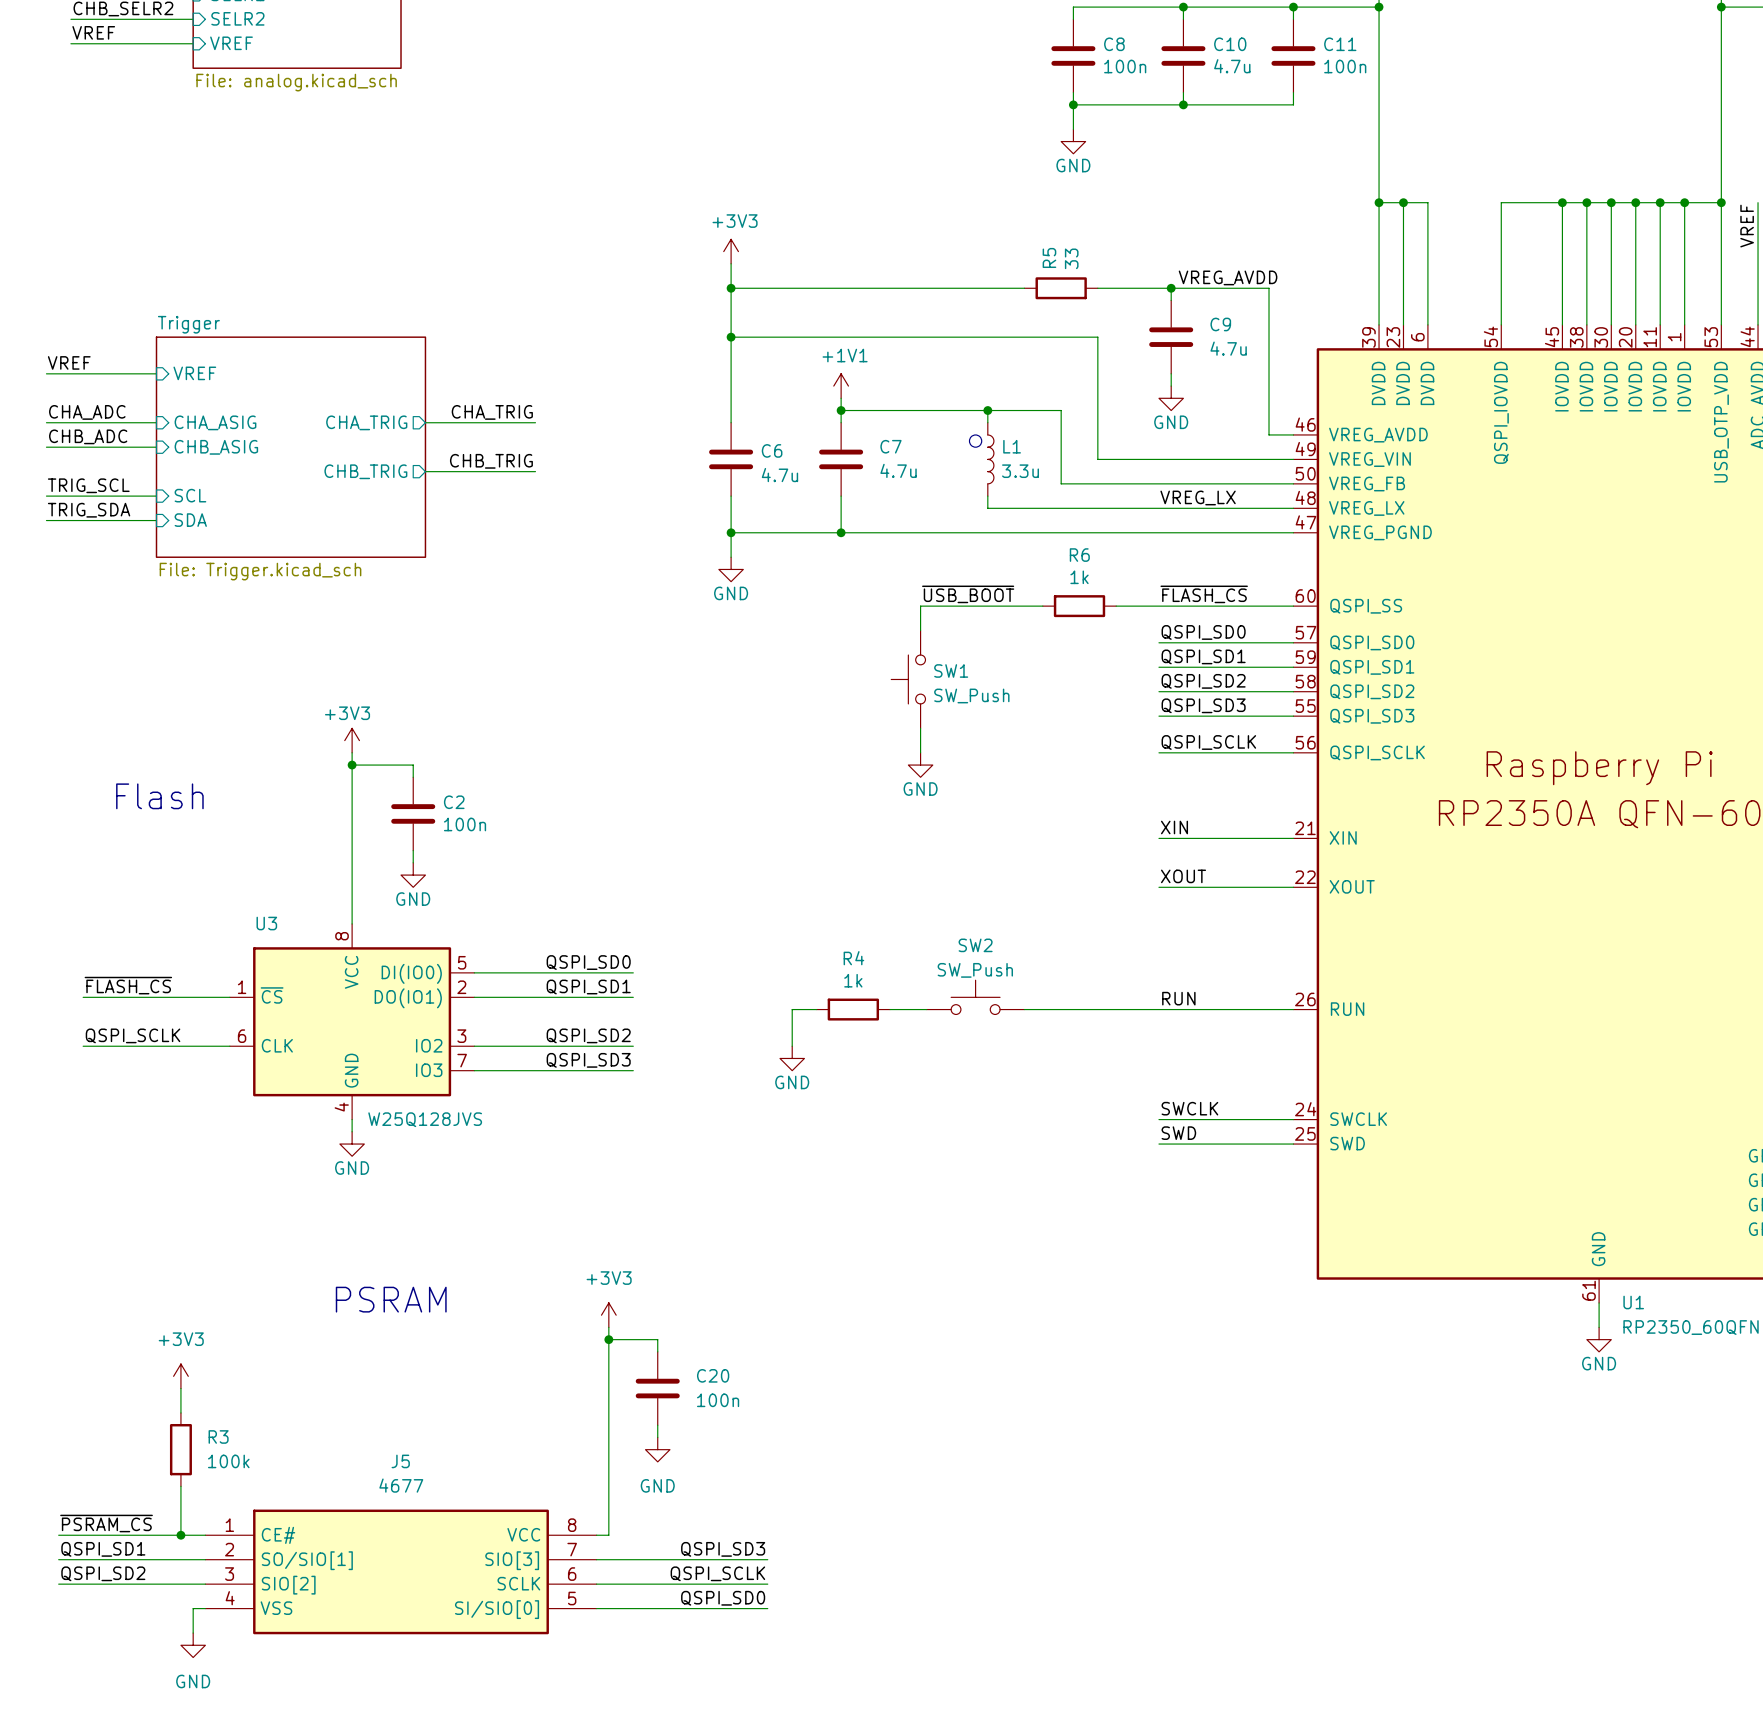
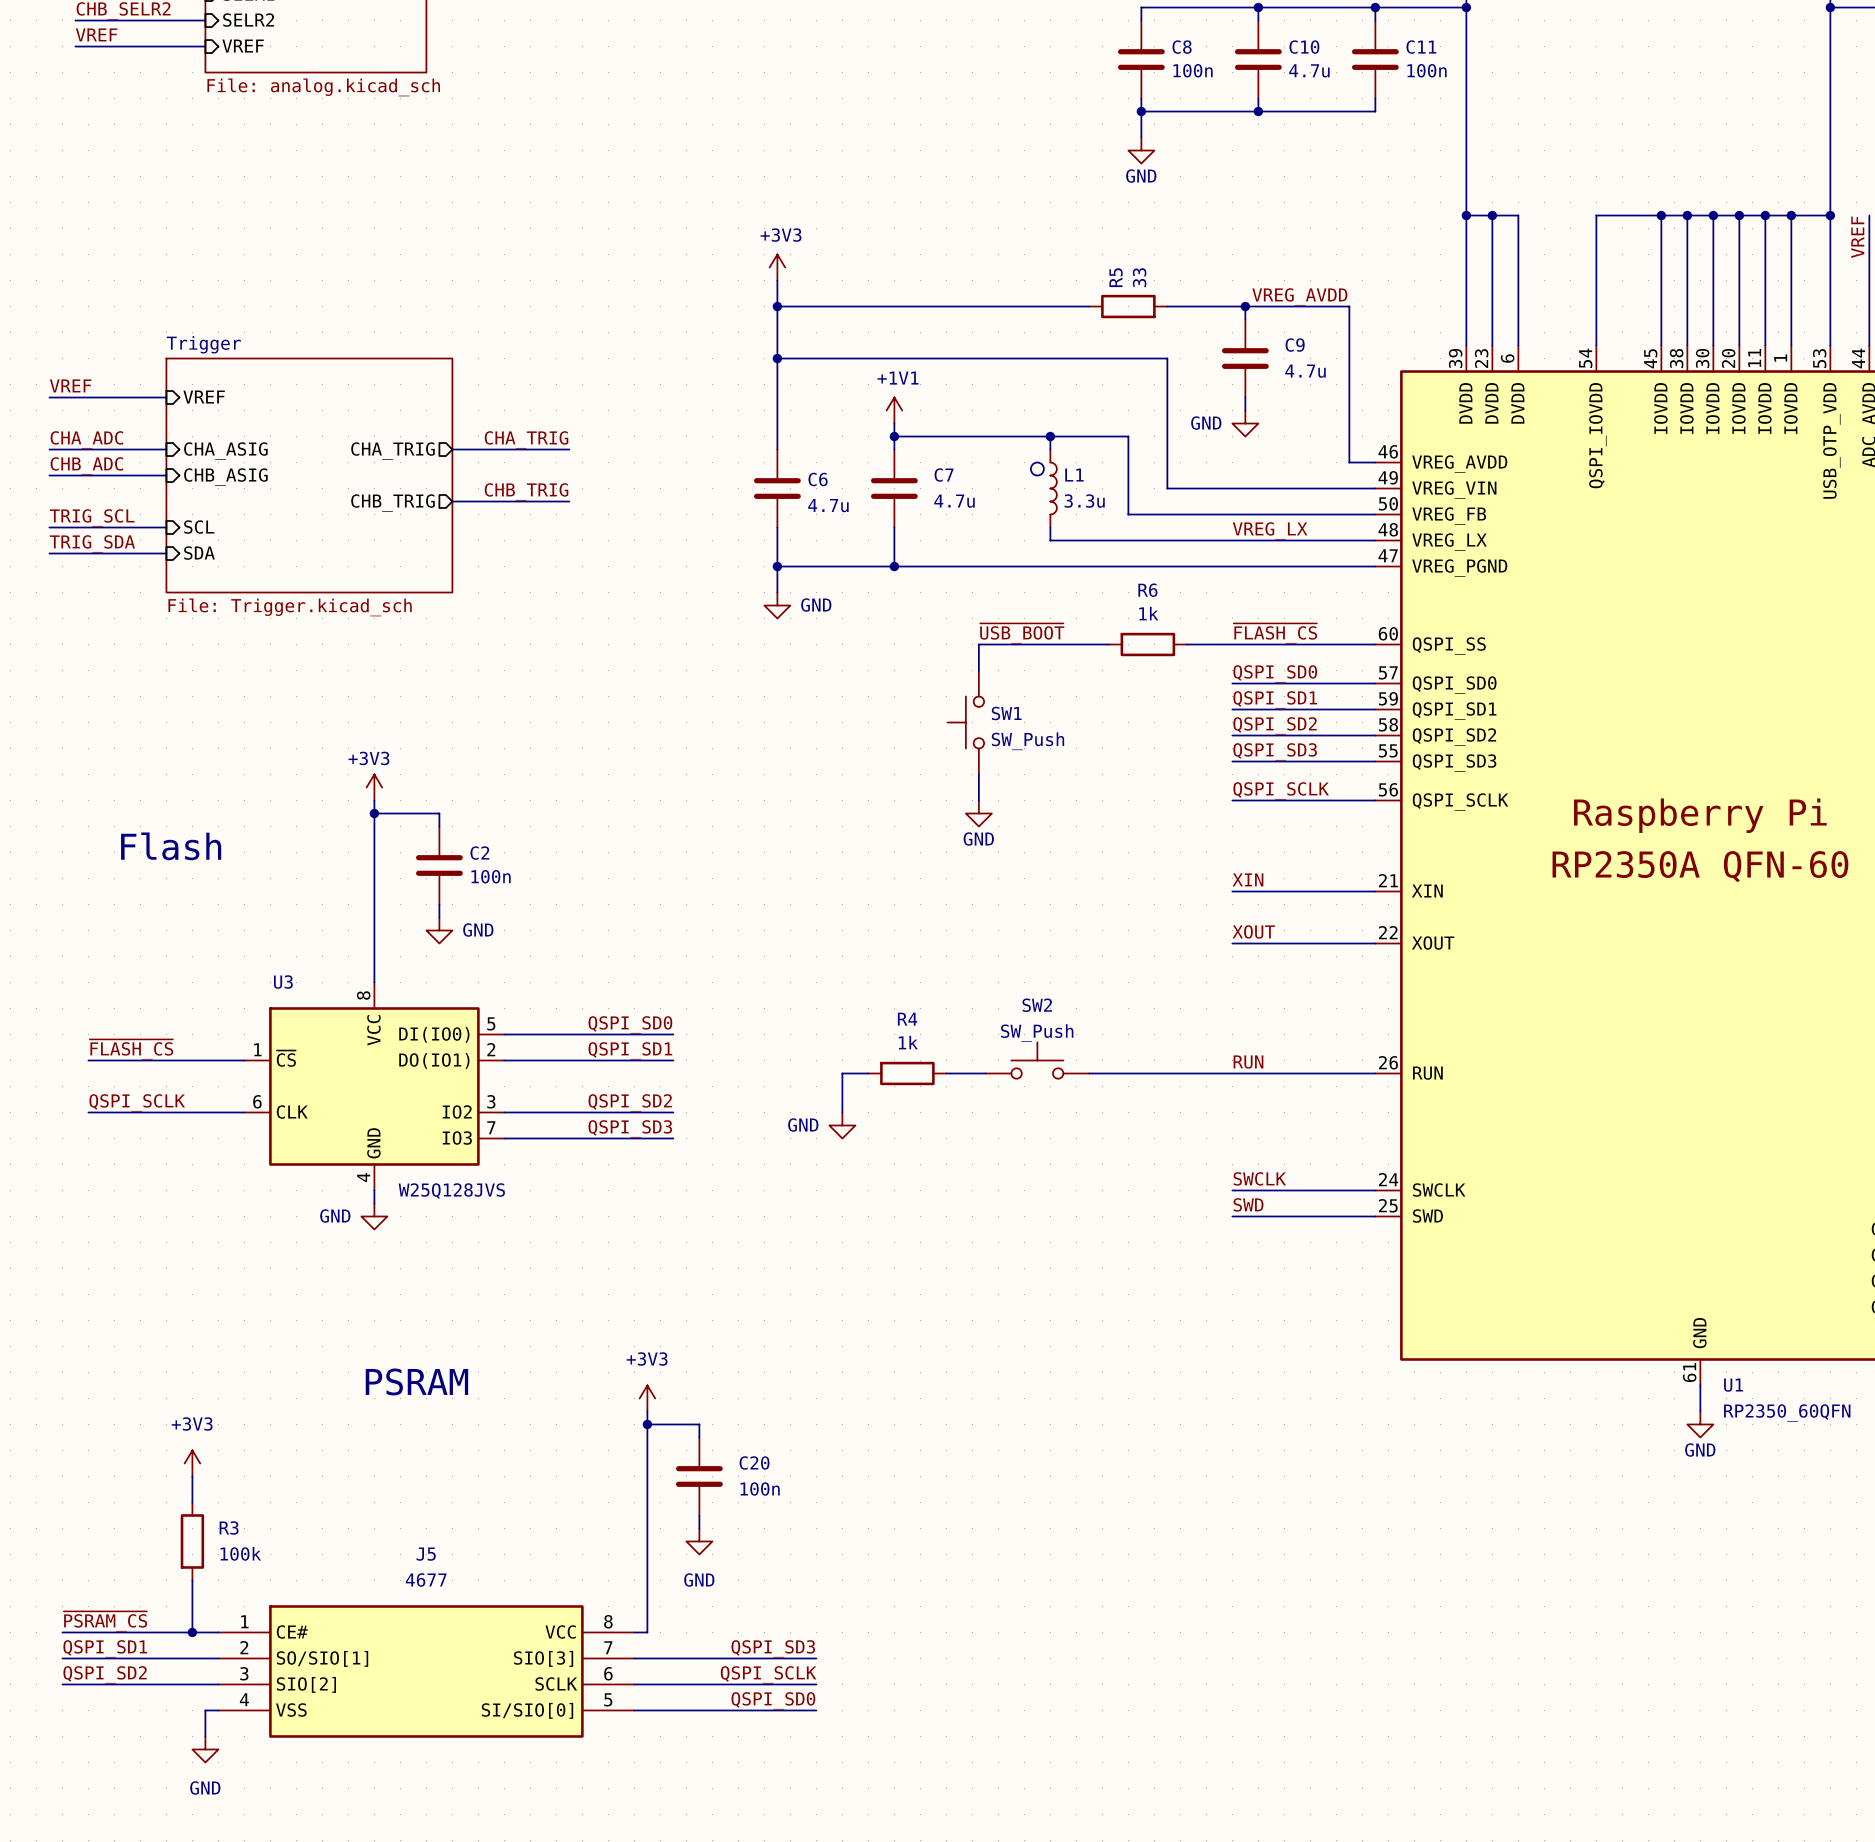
power symbol text position: GND (1171, 422) -> GND (1206, 423)
power symbol text position: GND (731, 593) -> GND (816, 605)
power symbol text position: GND (413, 899) -> GND (478, 930)
power symbol text position: GND (792, 1082) -> GND (803, 1125)
power symbol text position: GND (352, 1168) -> GND (335, 1216)

